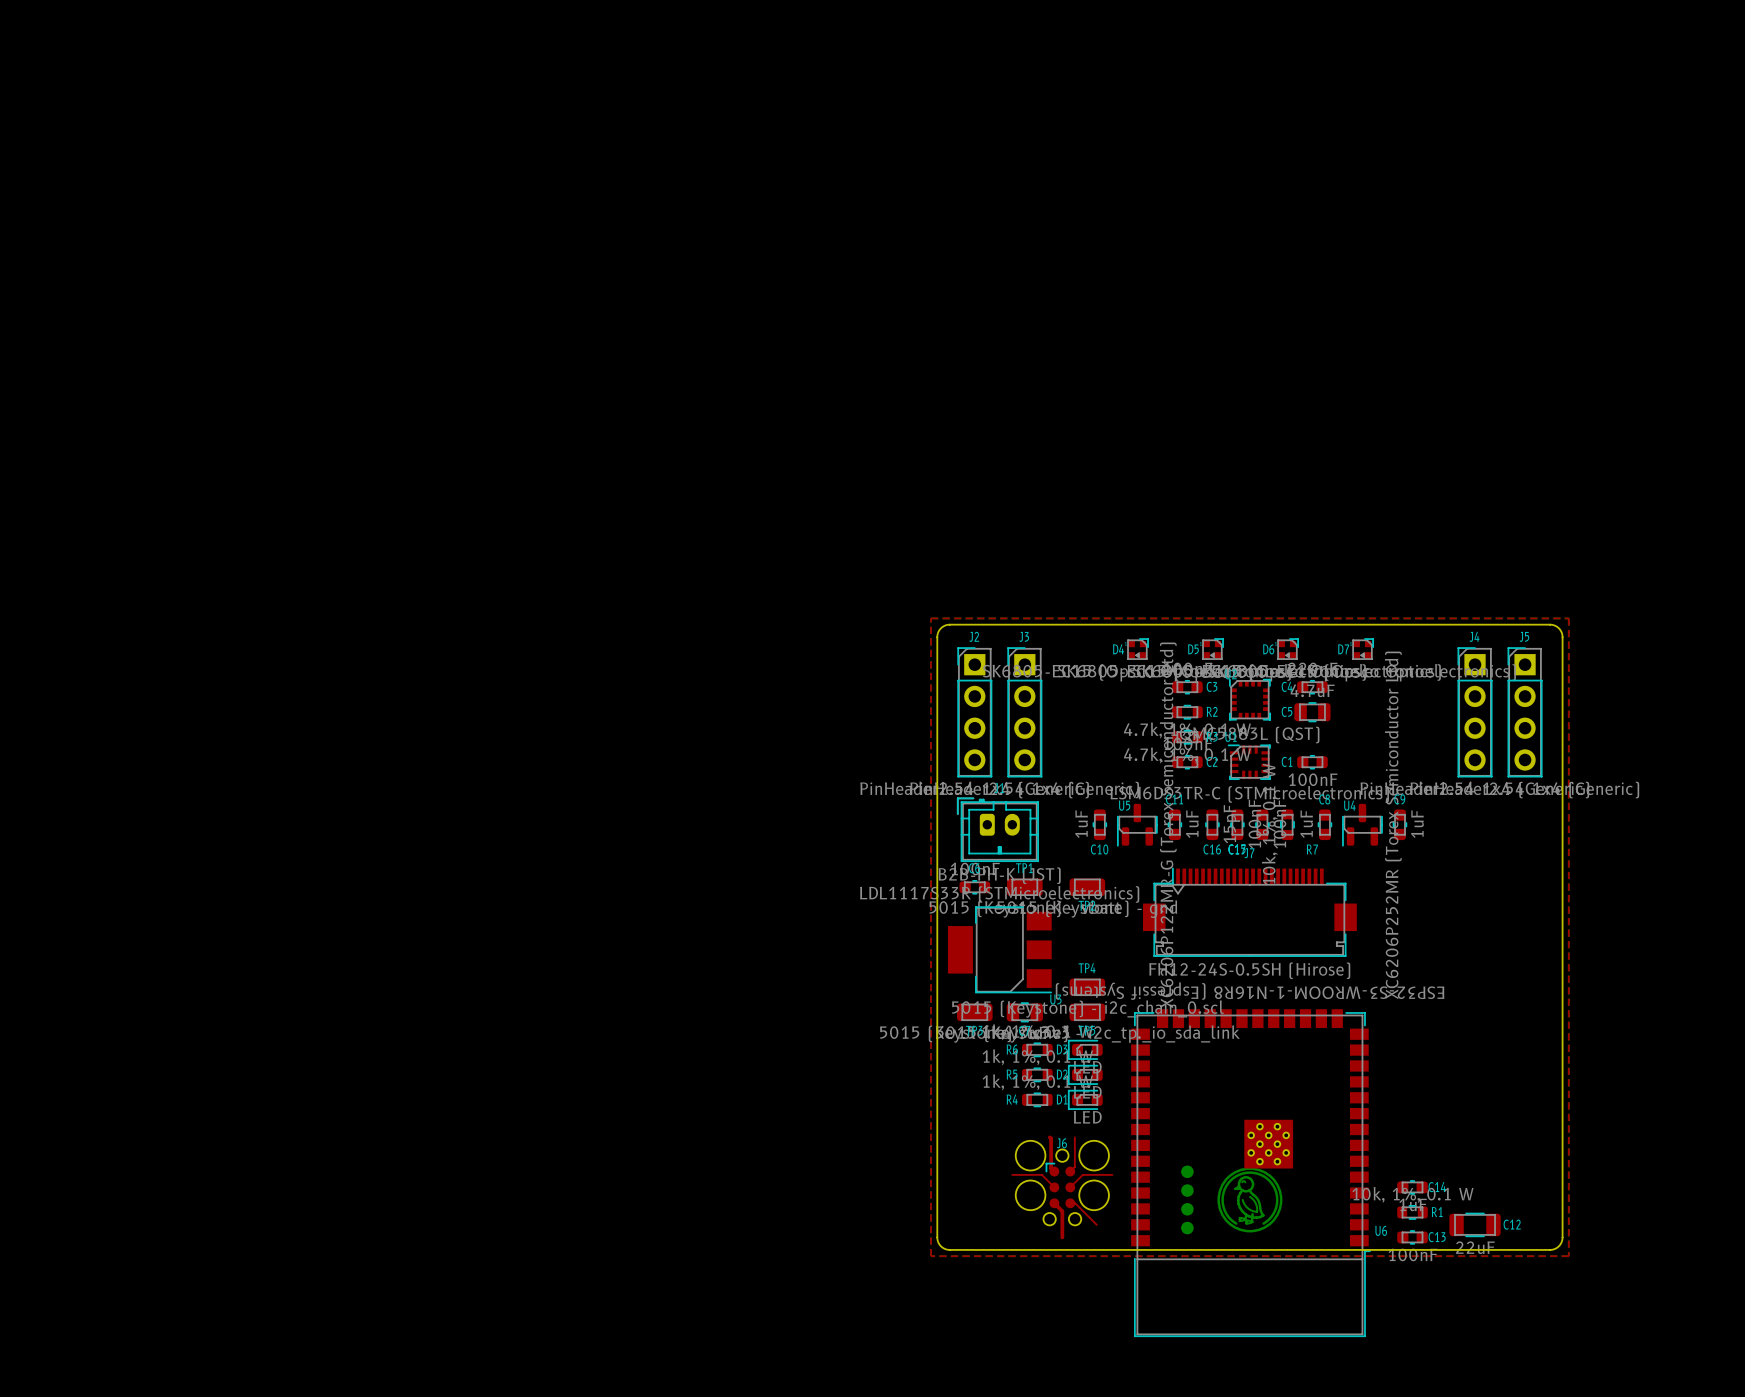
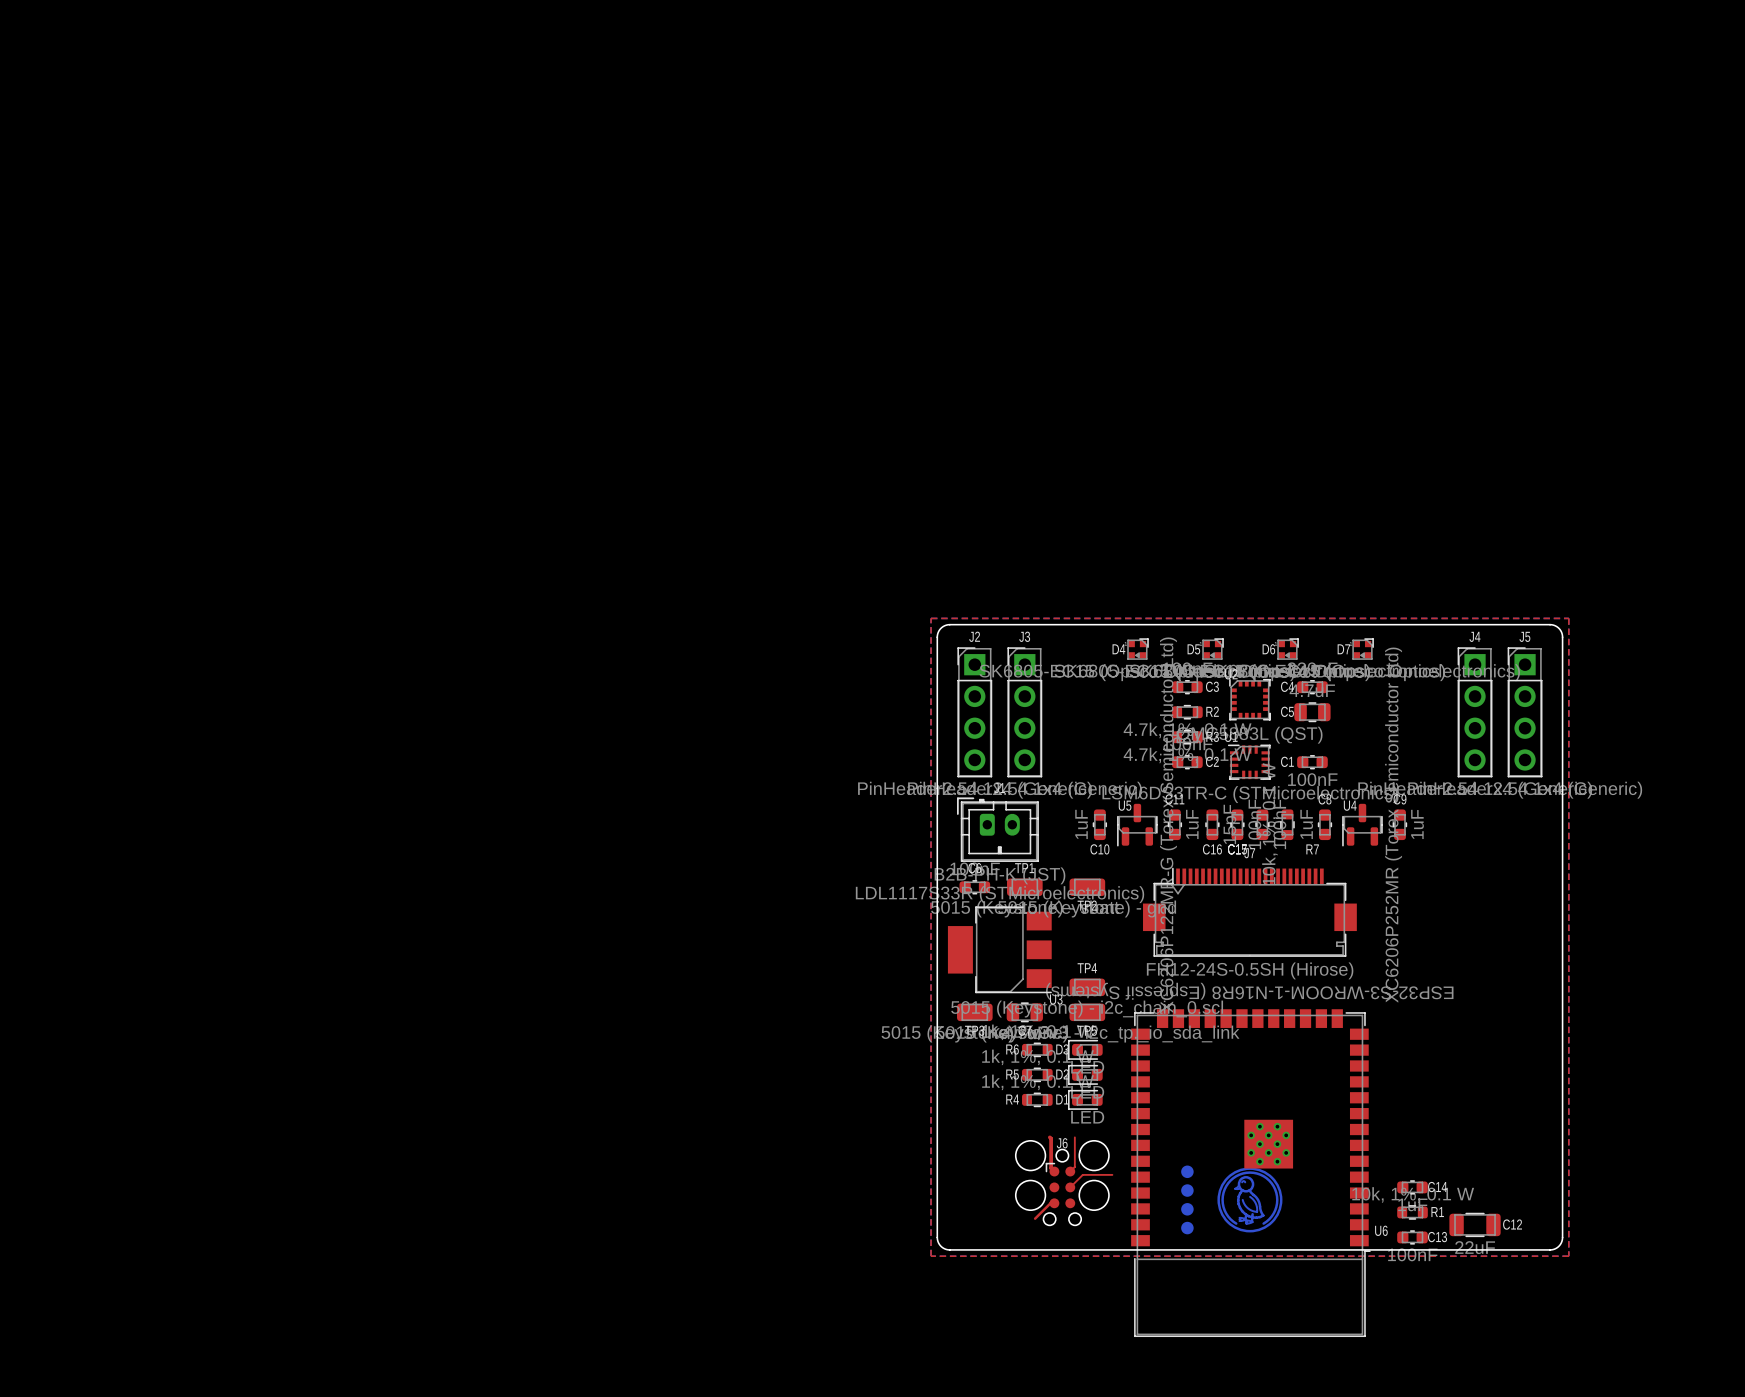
top track: (1012, 1174) (1041, 1174) (1054, 1187) -> none
top track: (1054, 1203) (1062, 1211) (1062, 1237) -> (1054, 1203) (1050, 1203) (1035, 1218)
top track: (1070, 1203) (1075, 1203) (1096, 1224) -> none

